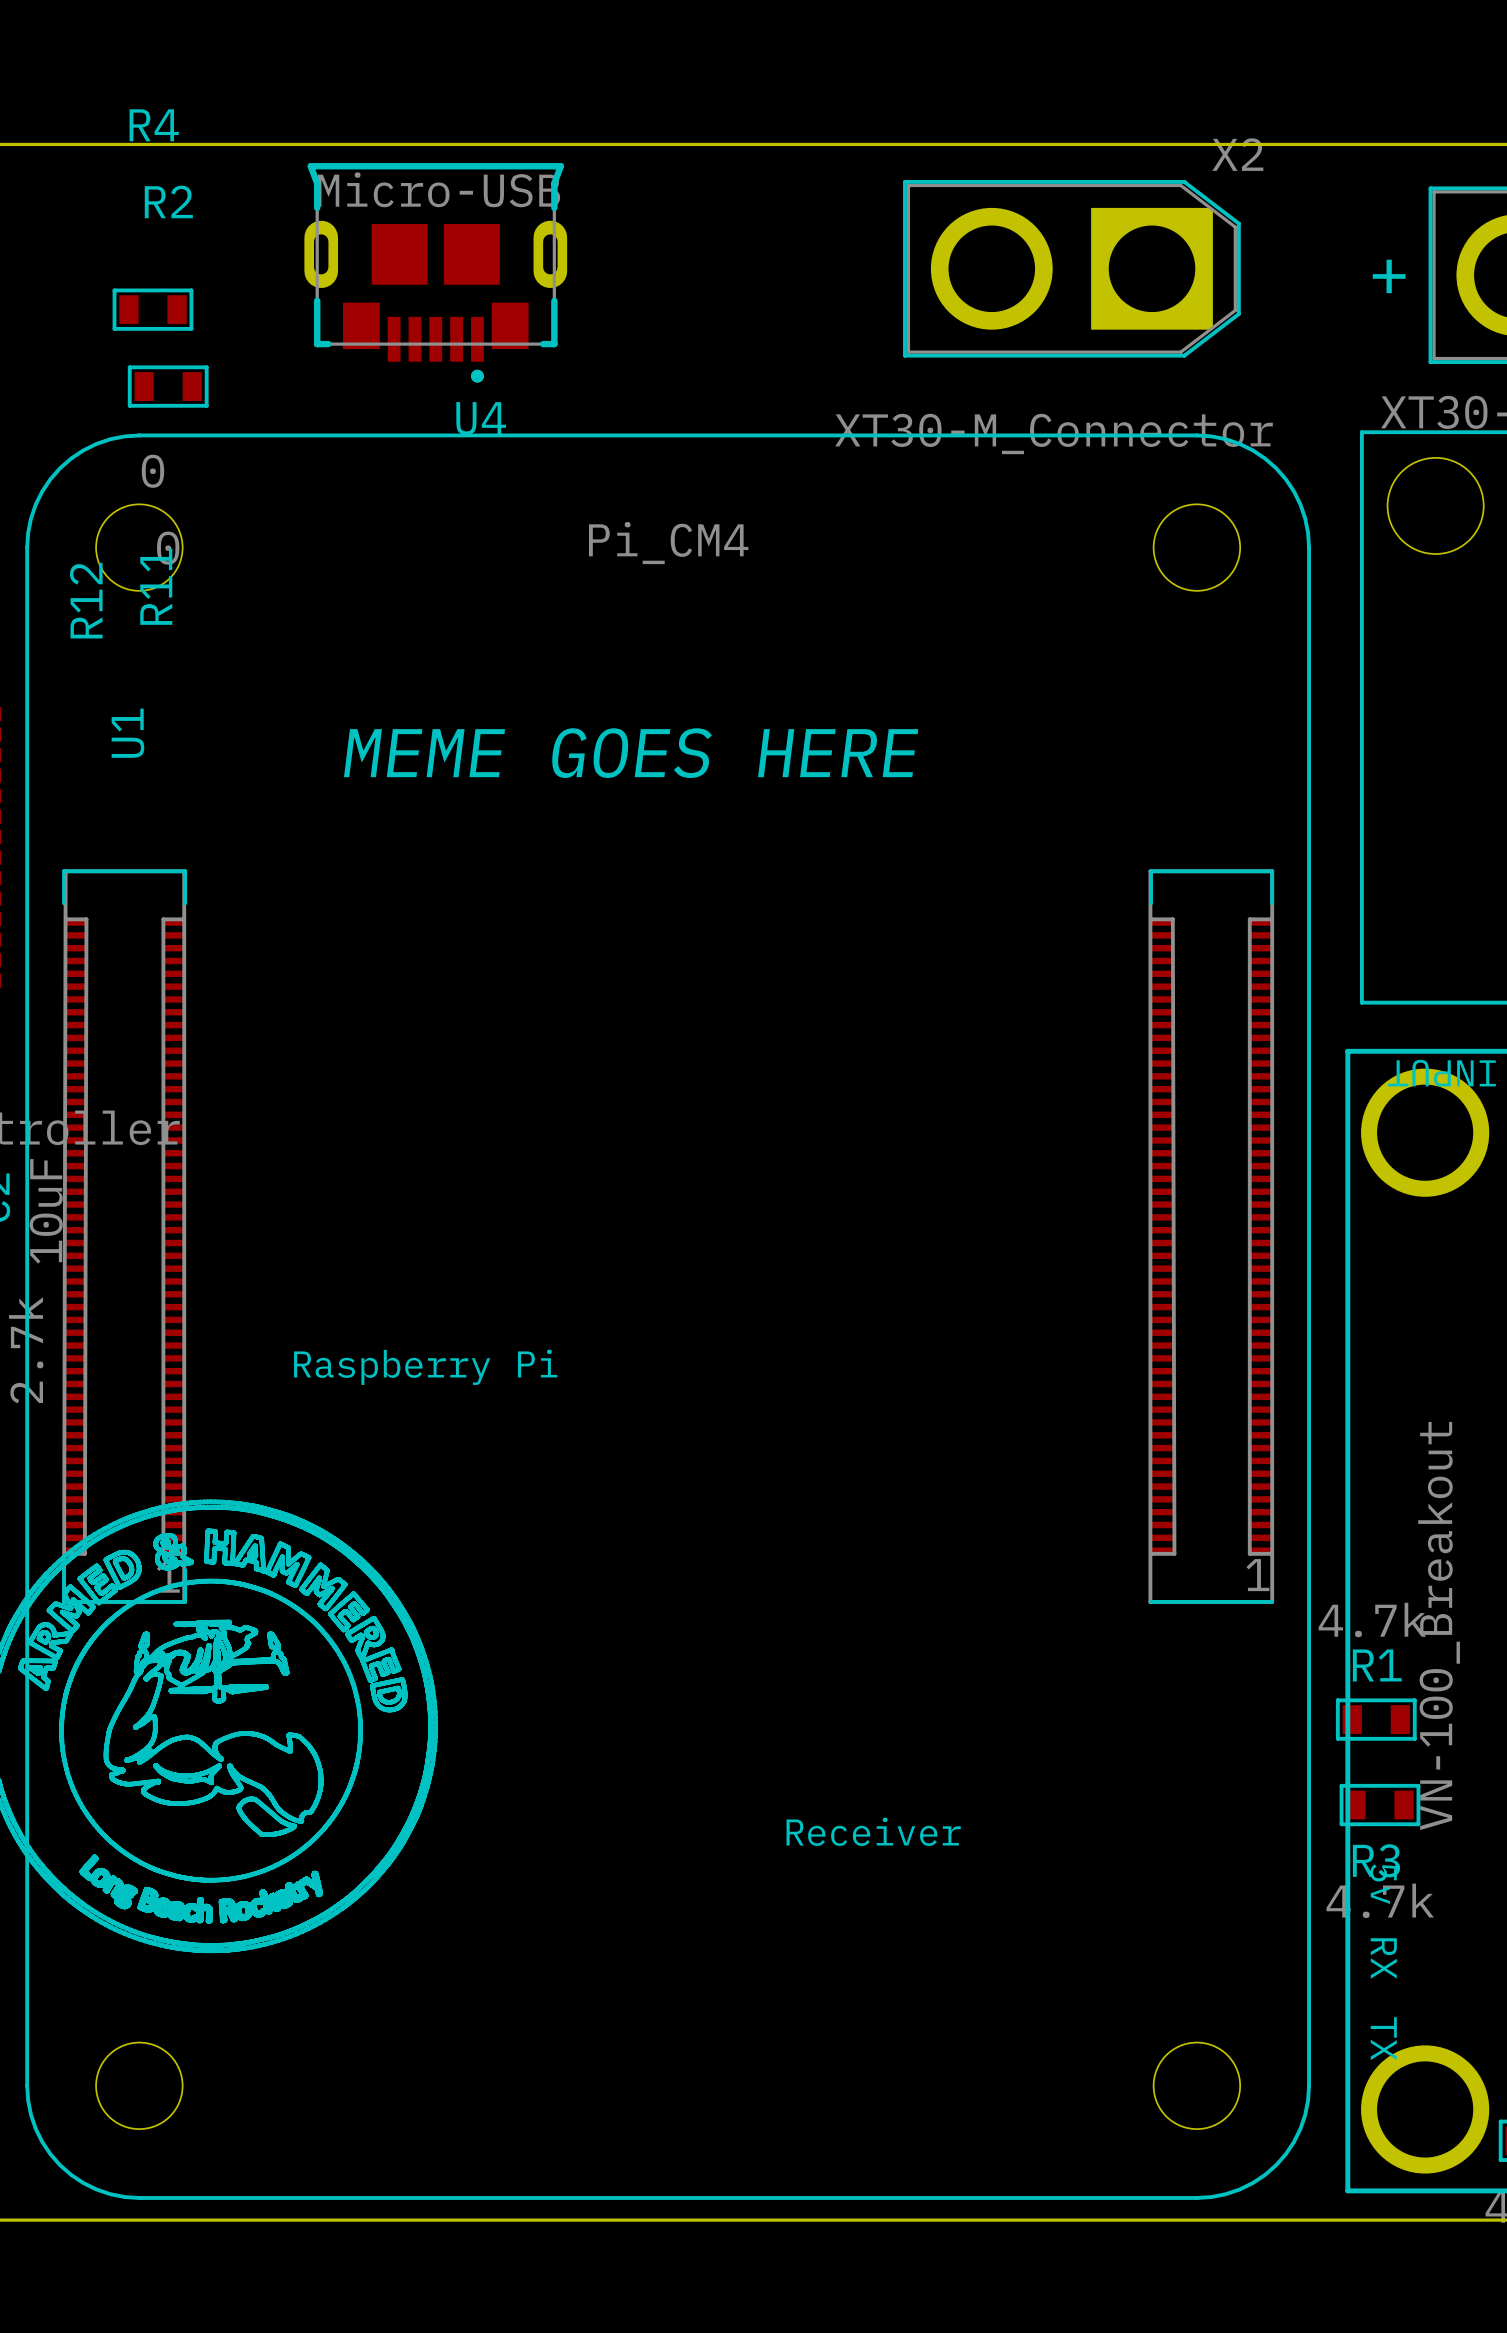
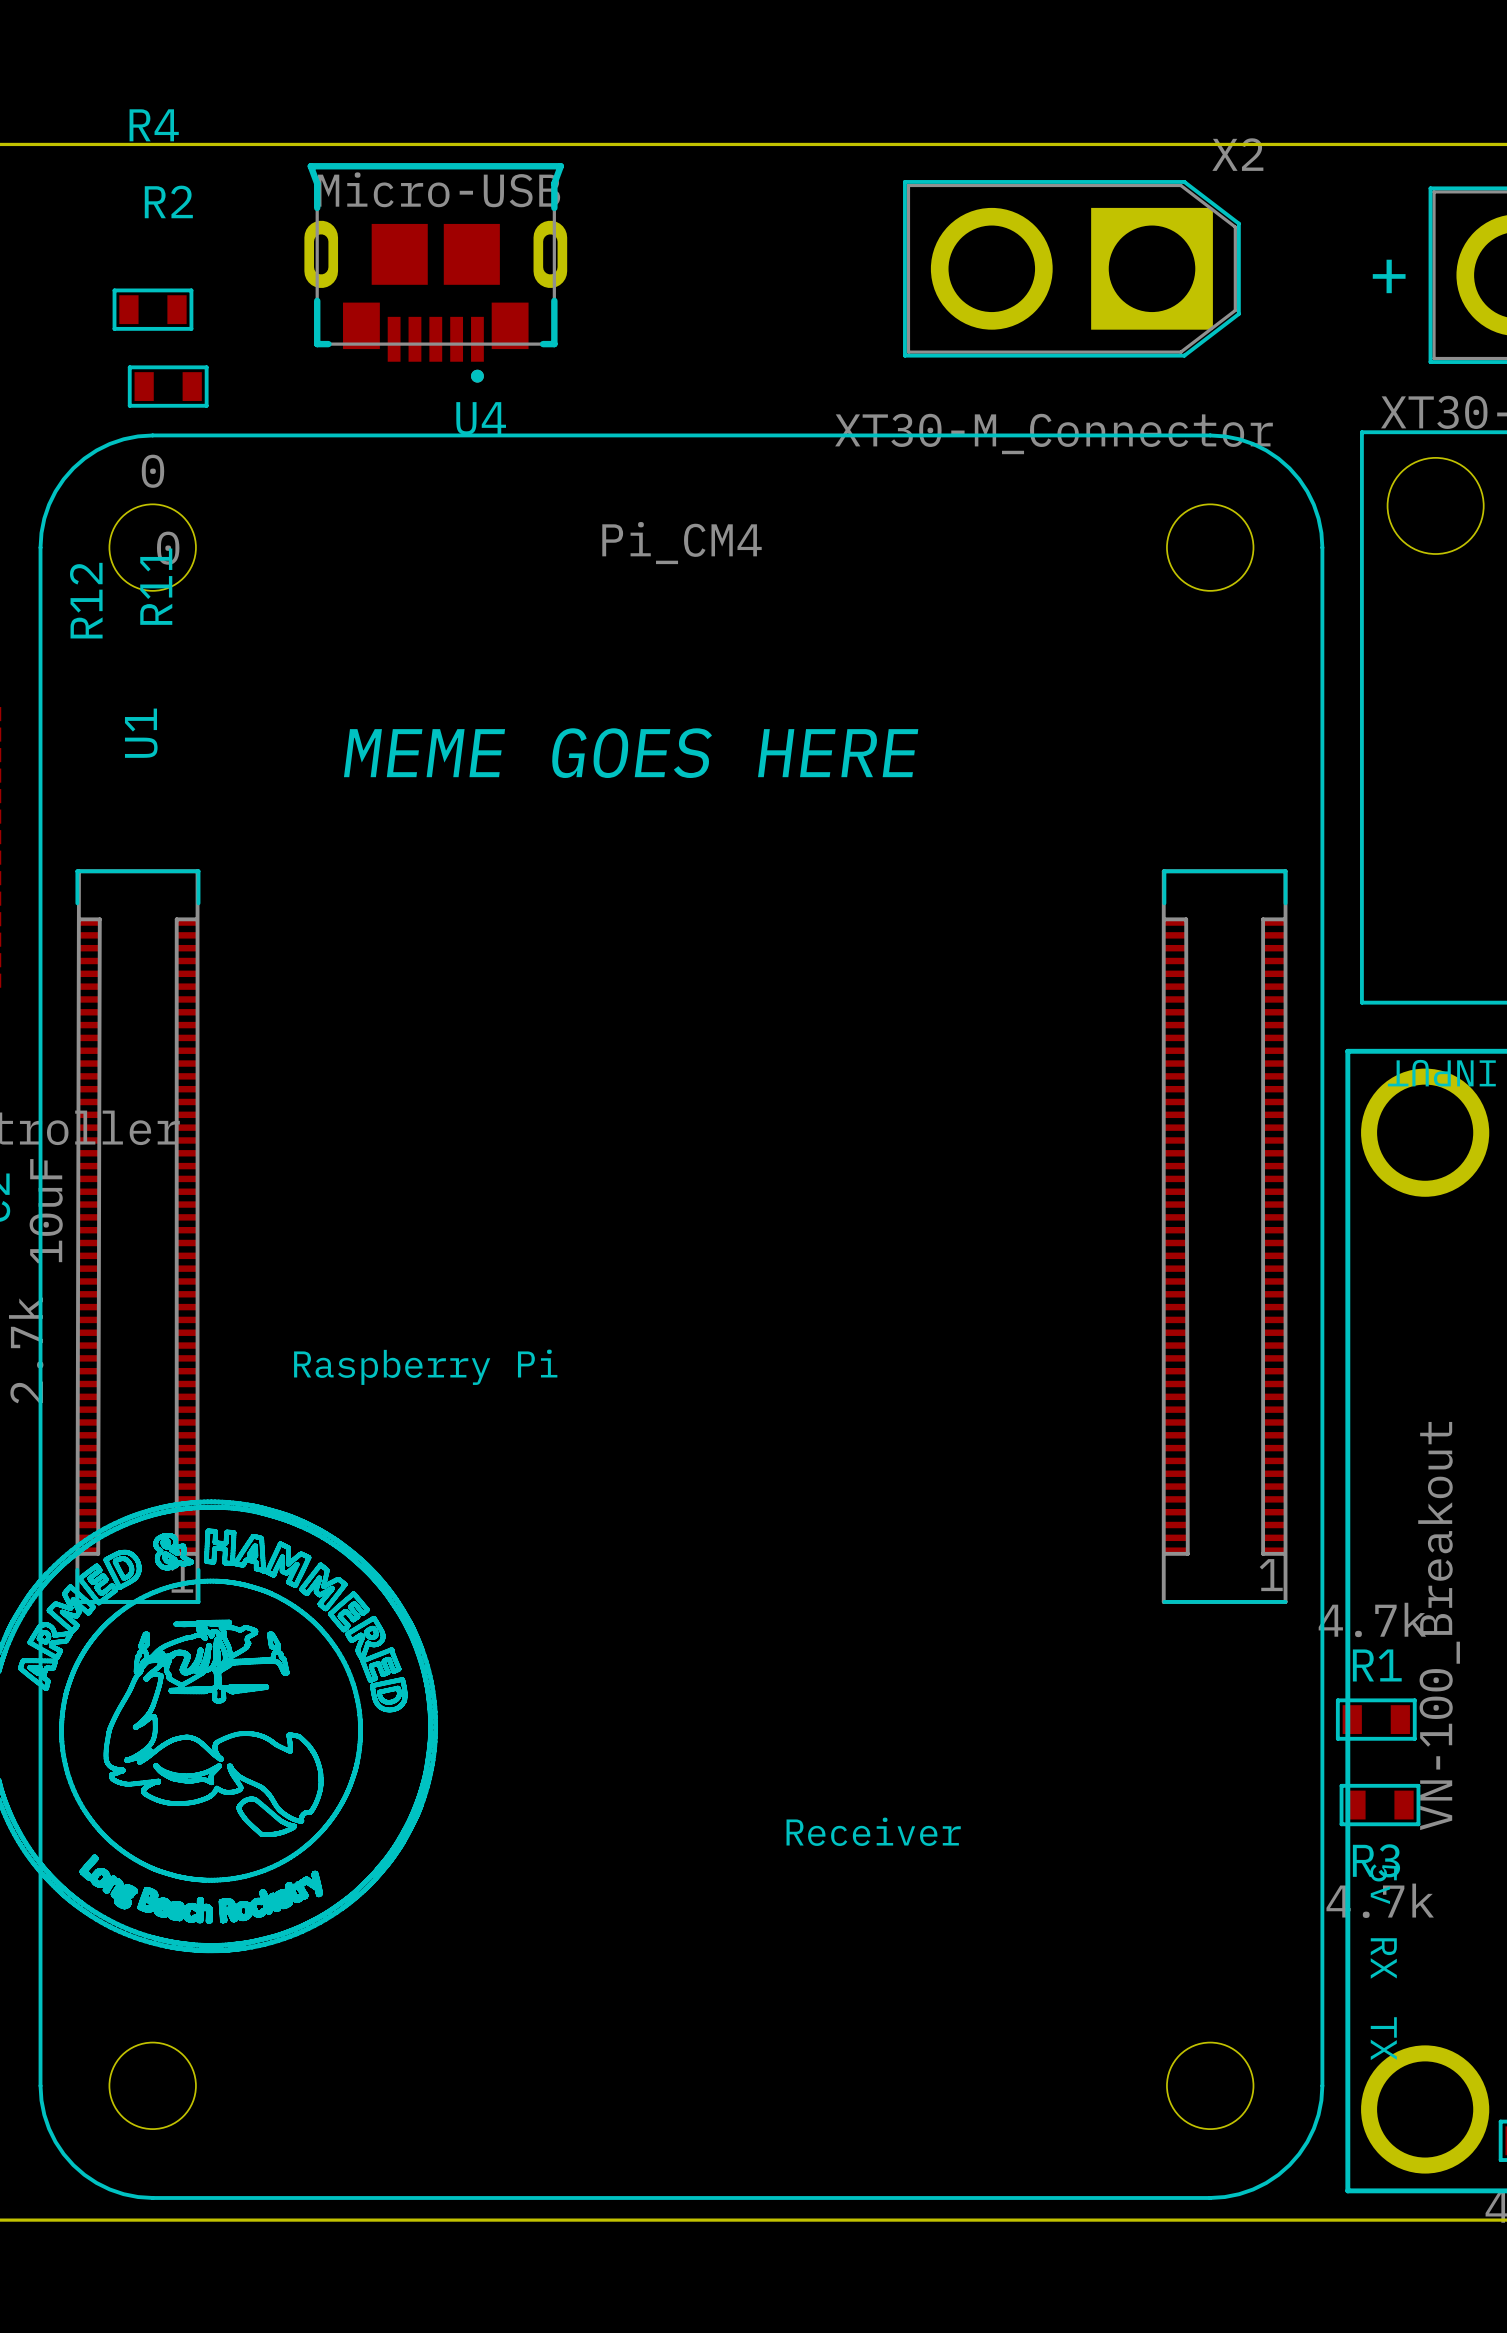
U1 position: (668, 1316) -> (681, 1316)

